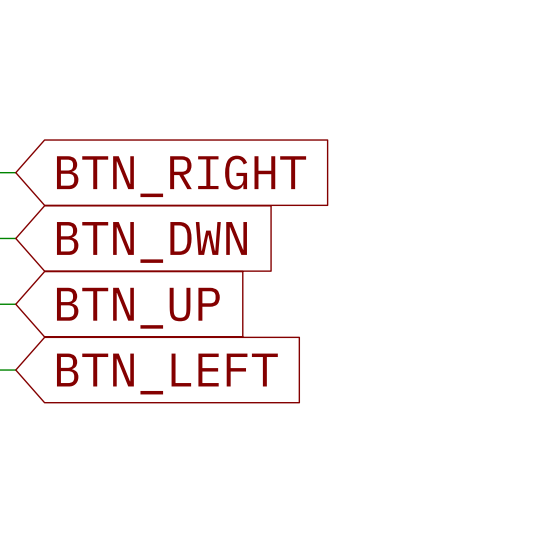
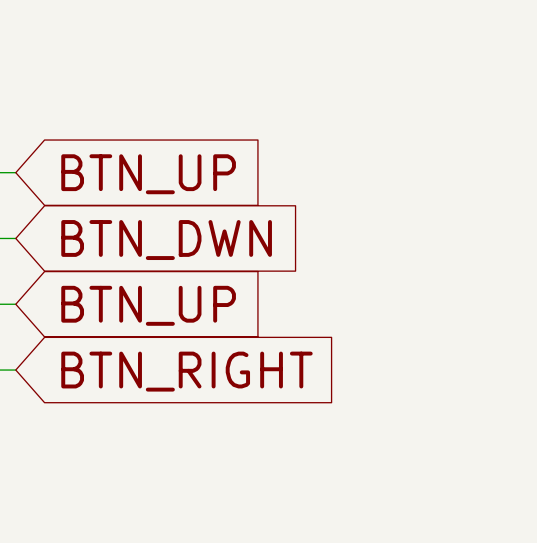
global label: BTN_RIGHT (181, 176) -> BTN_UP (148, 174)
global label: BTN_LEFT (167, 374) -> BTN_RIGHT (186, 371)

